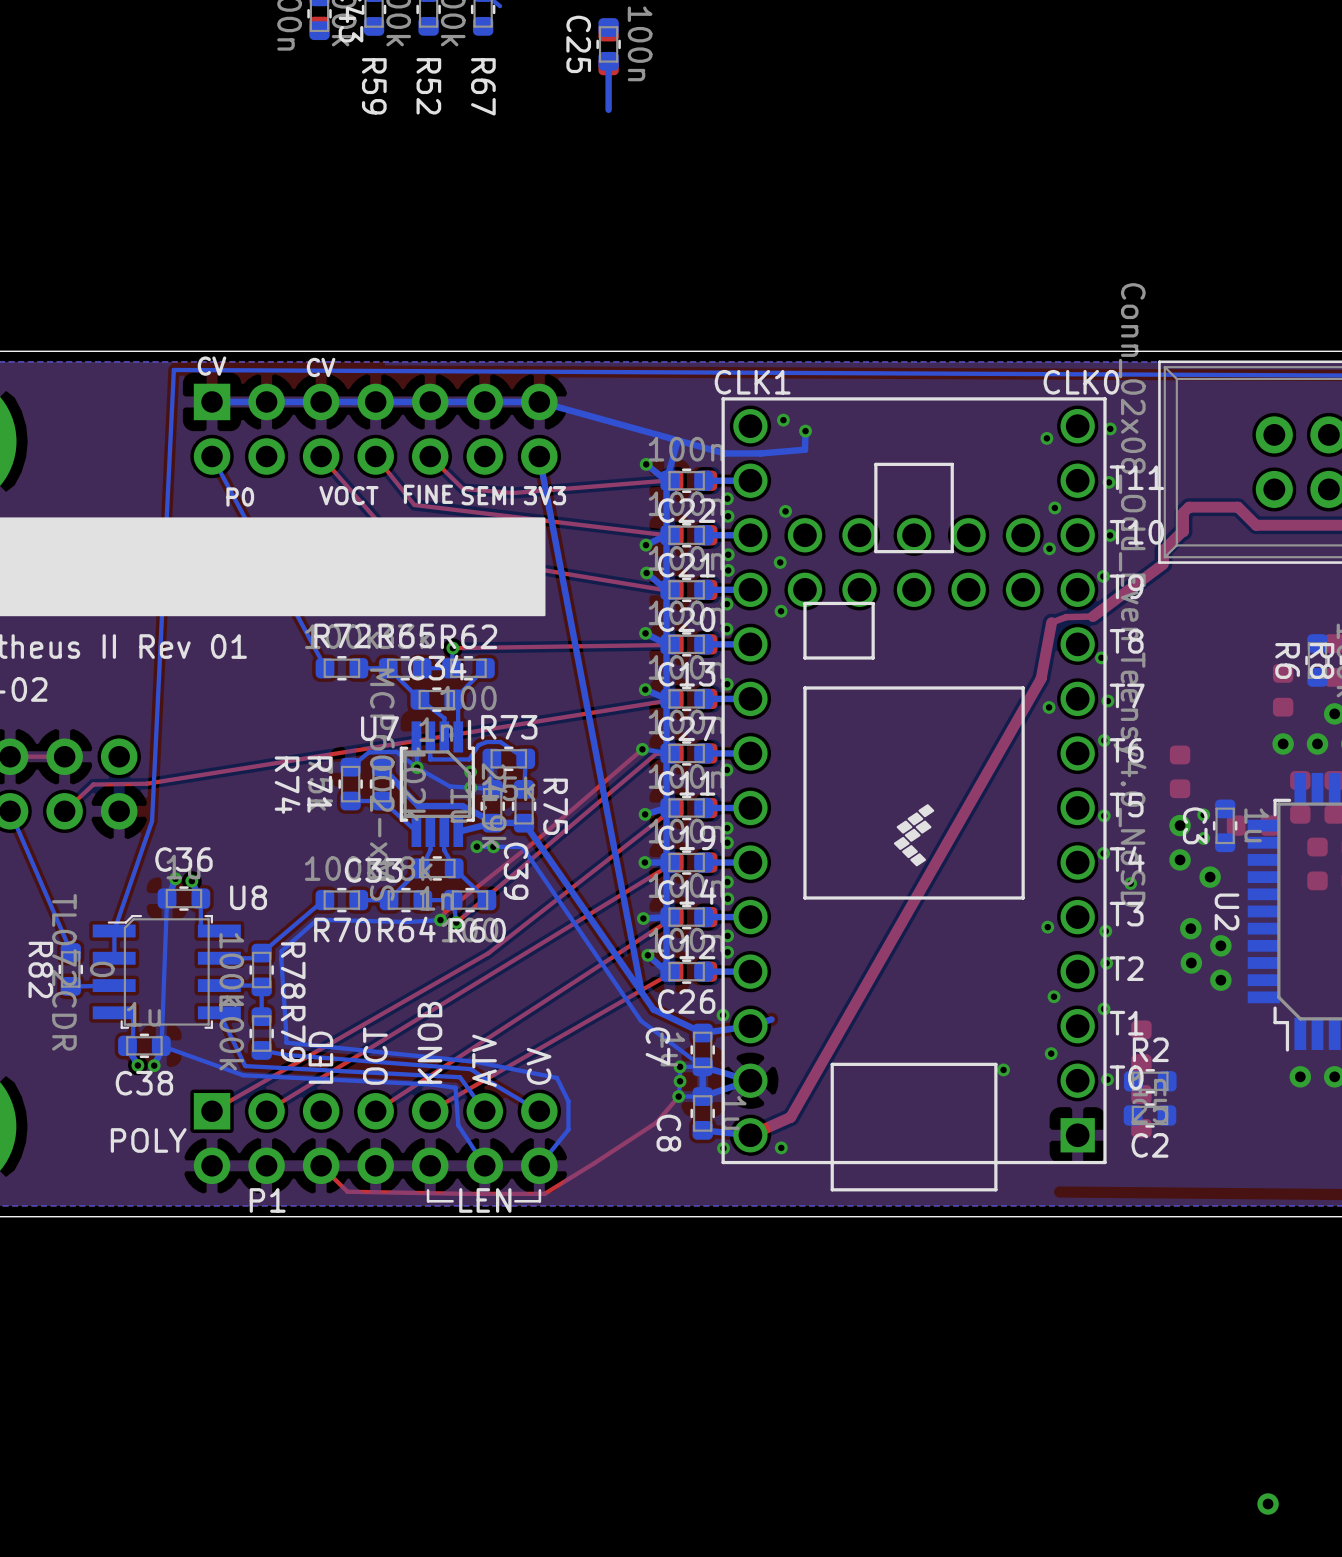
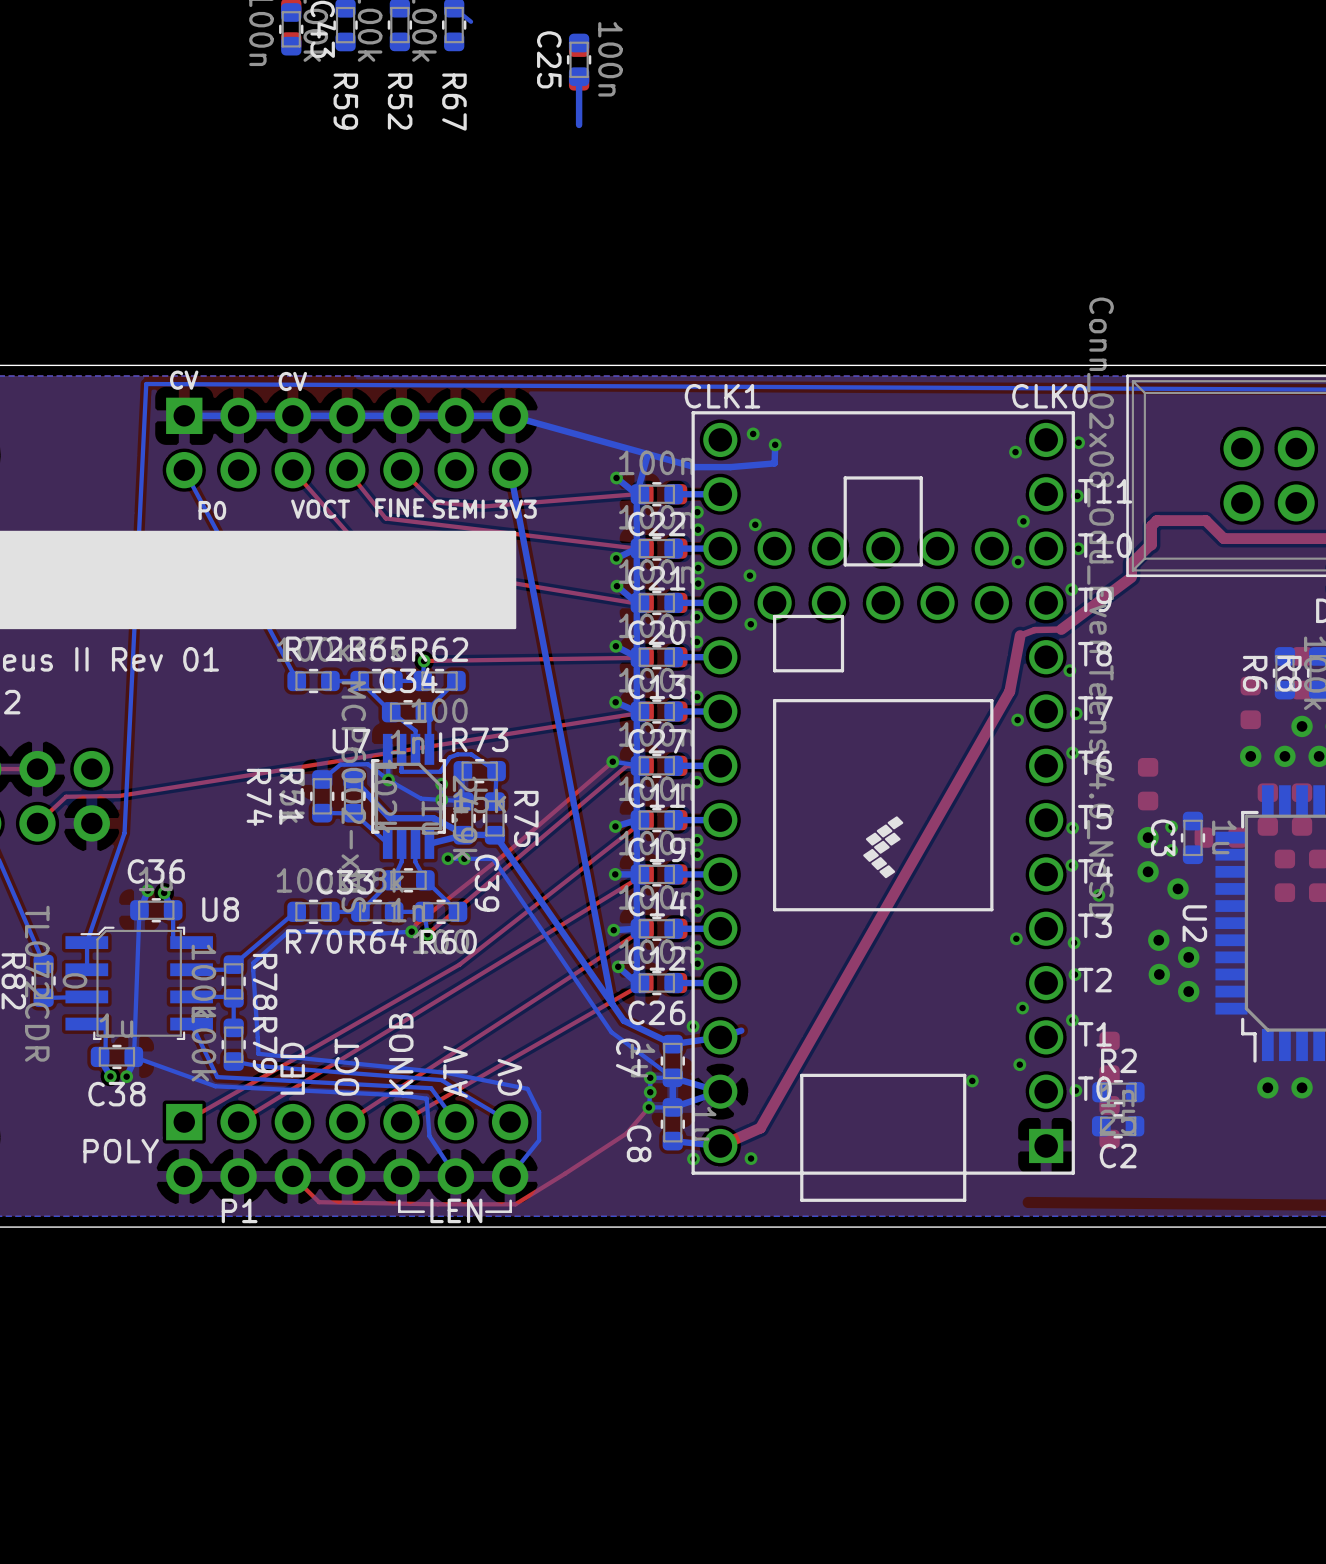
part: (1268, 1504) -> none

